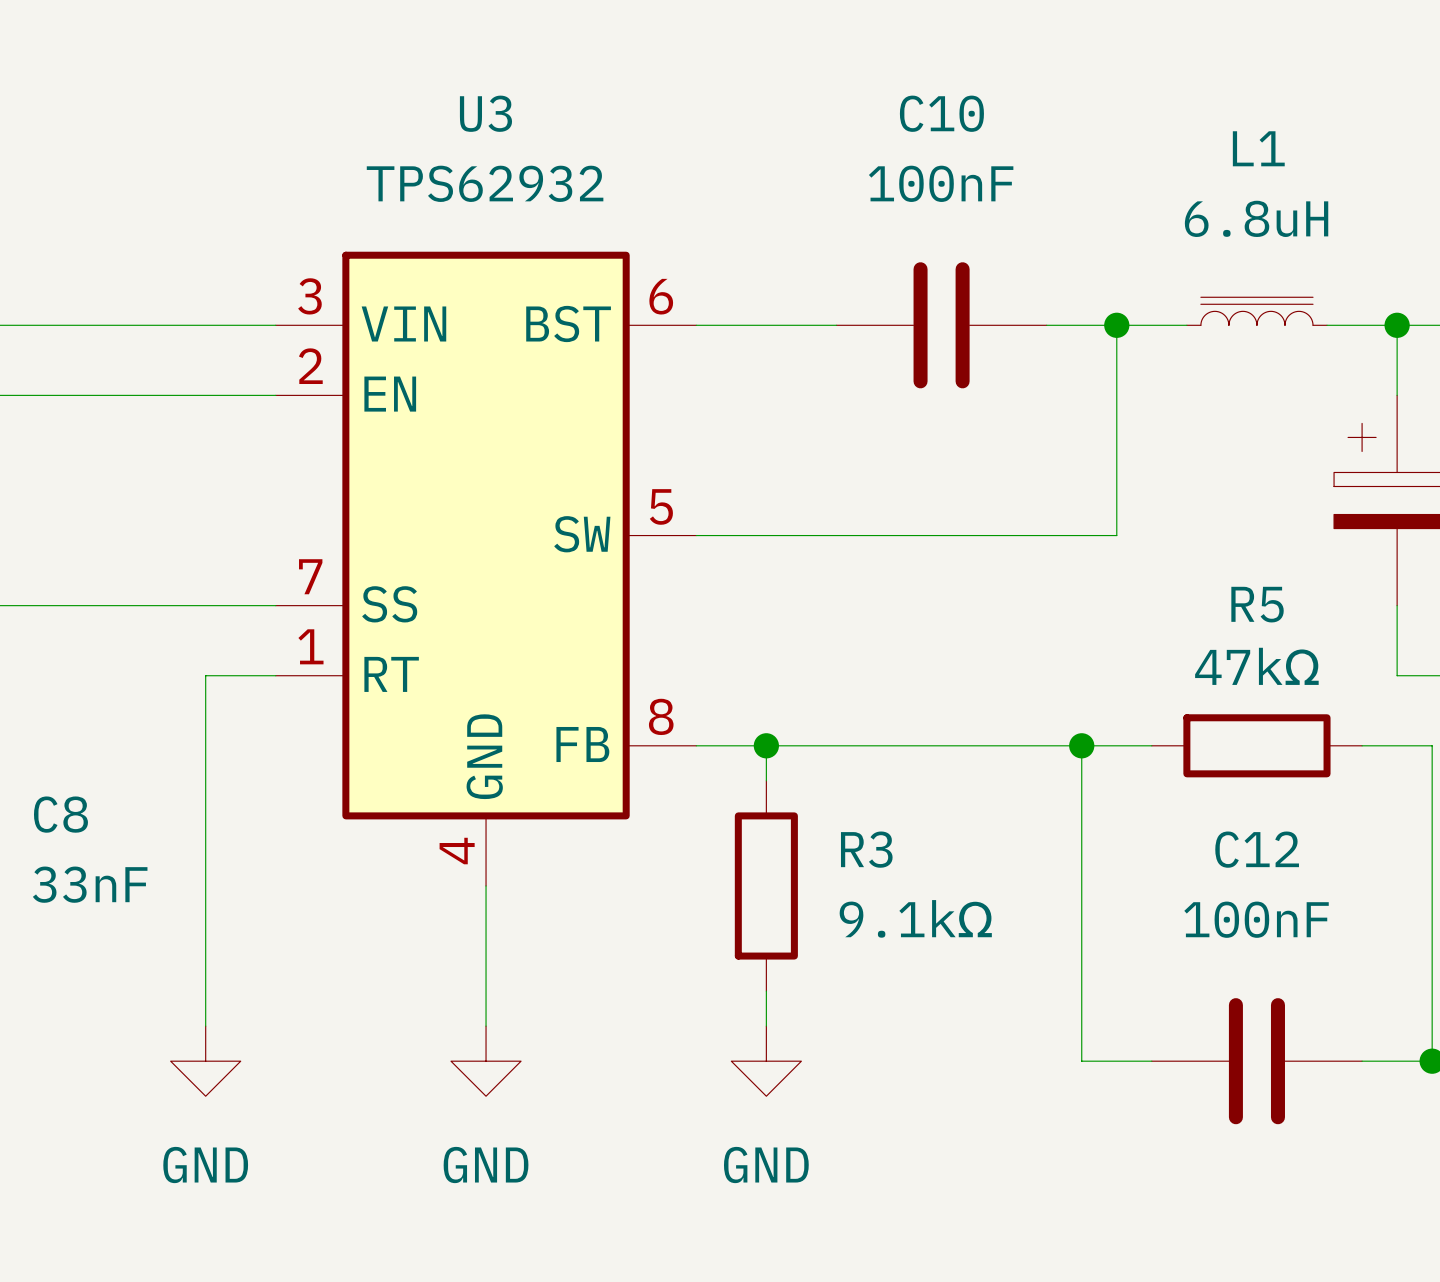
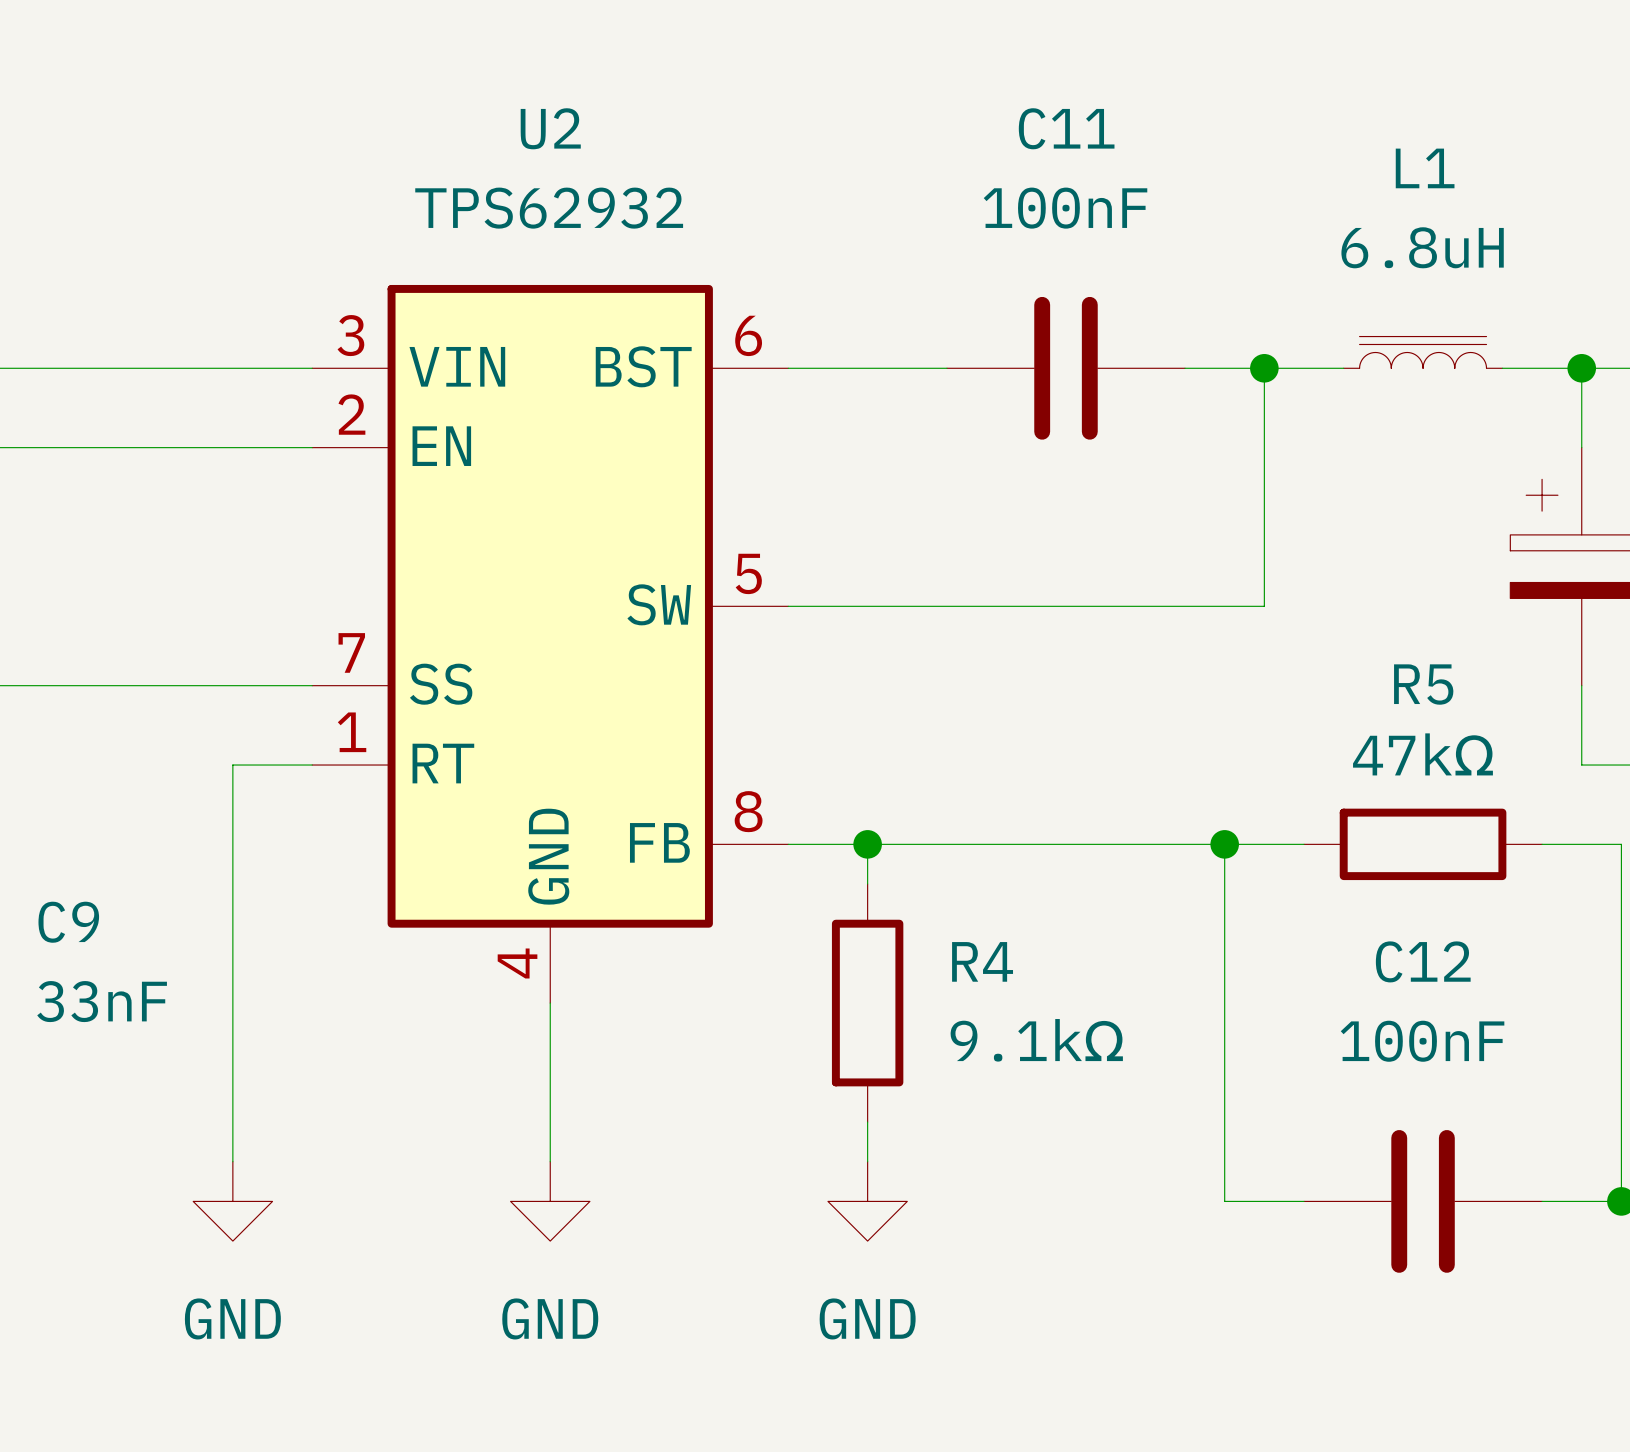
U3 name: U3 (485, 113) -> U2 (550, 128)
C10 name: C10 (941, 113) -> C11 (1066, 128)
C8 name: C8 (60, 814) -> C9 (68, 922)
R3 name: R3 (866, 849) -> R4 (982, 961)

